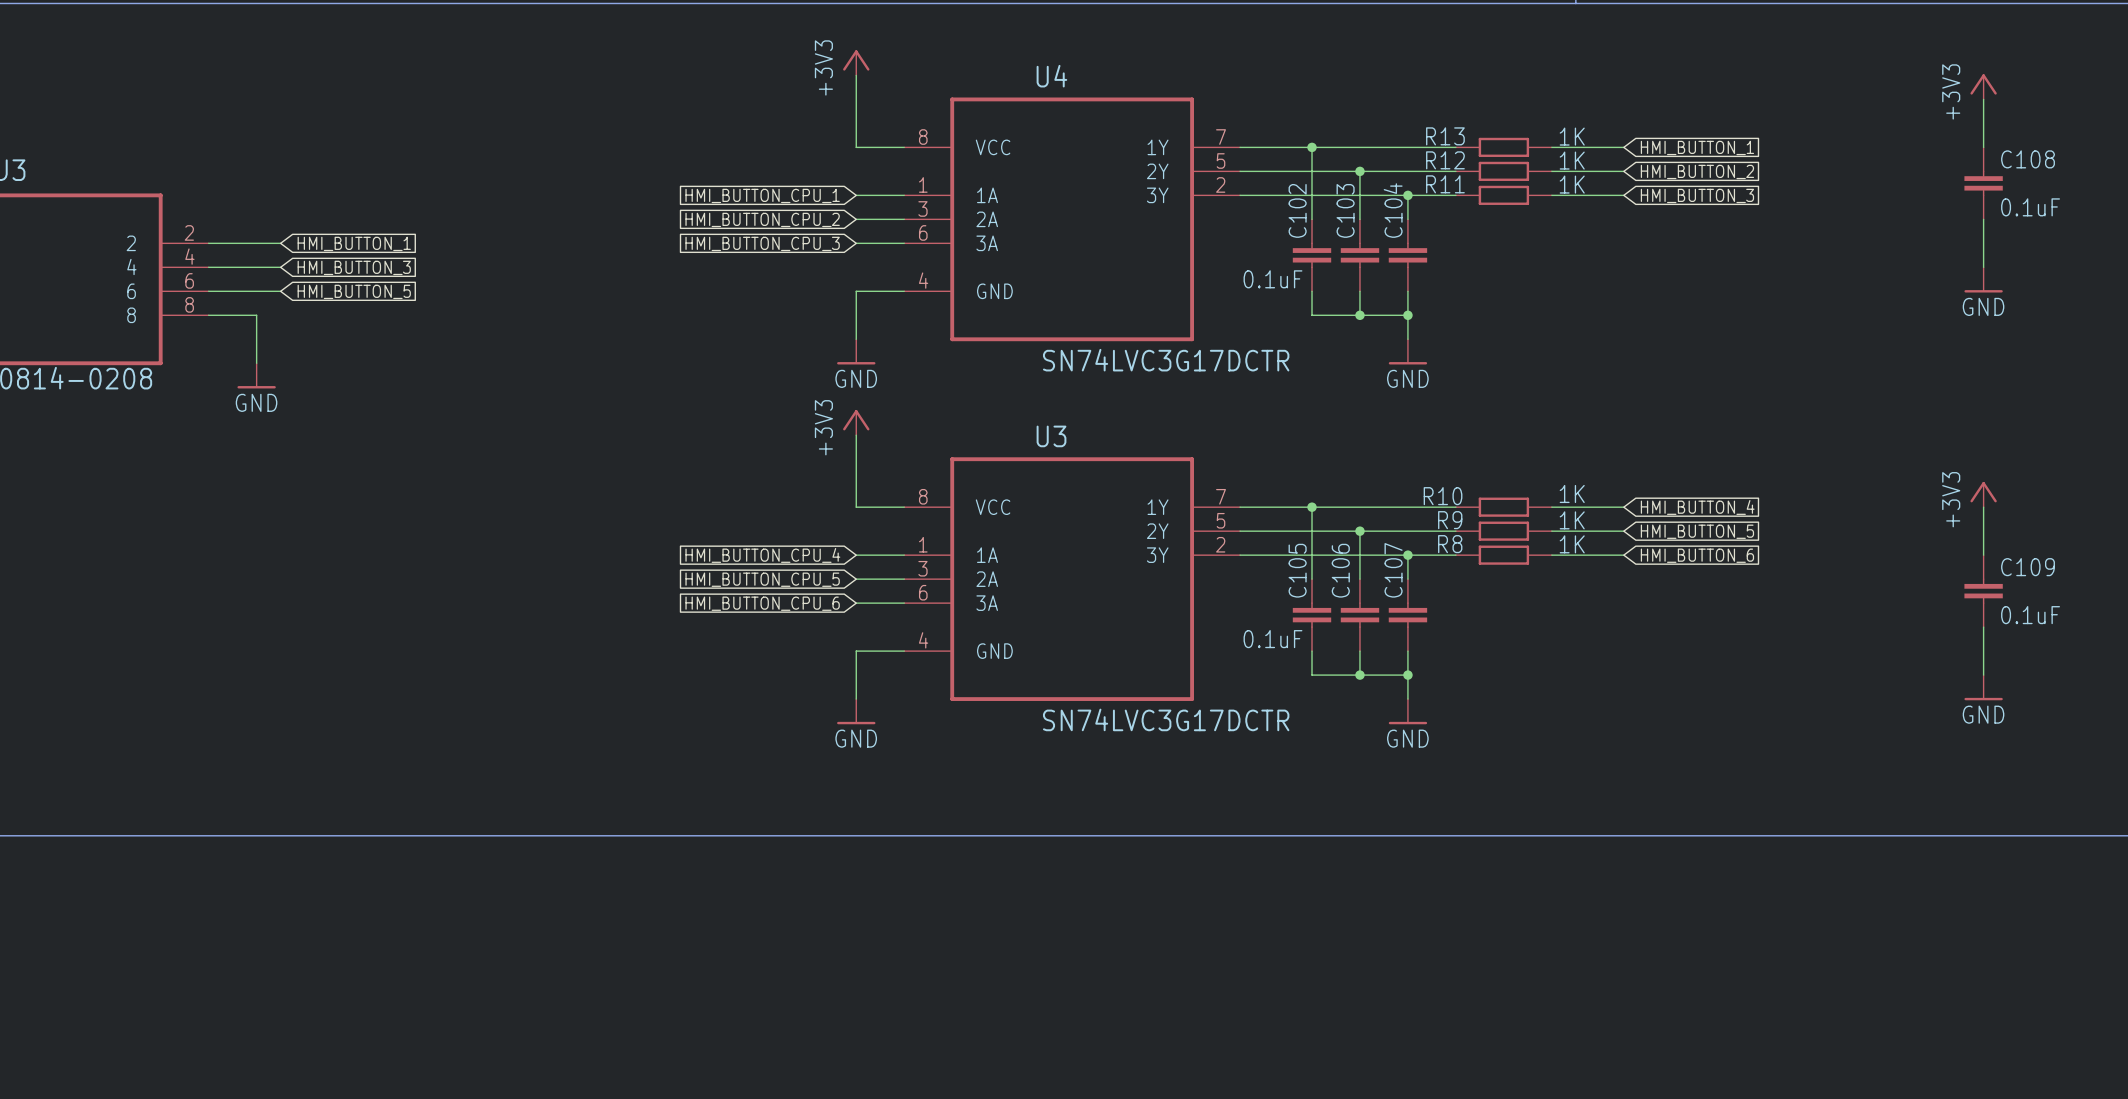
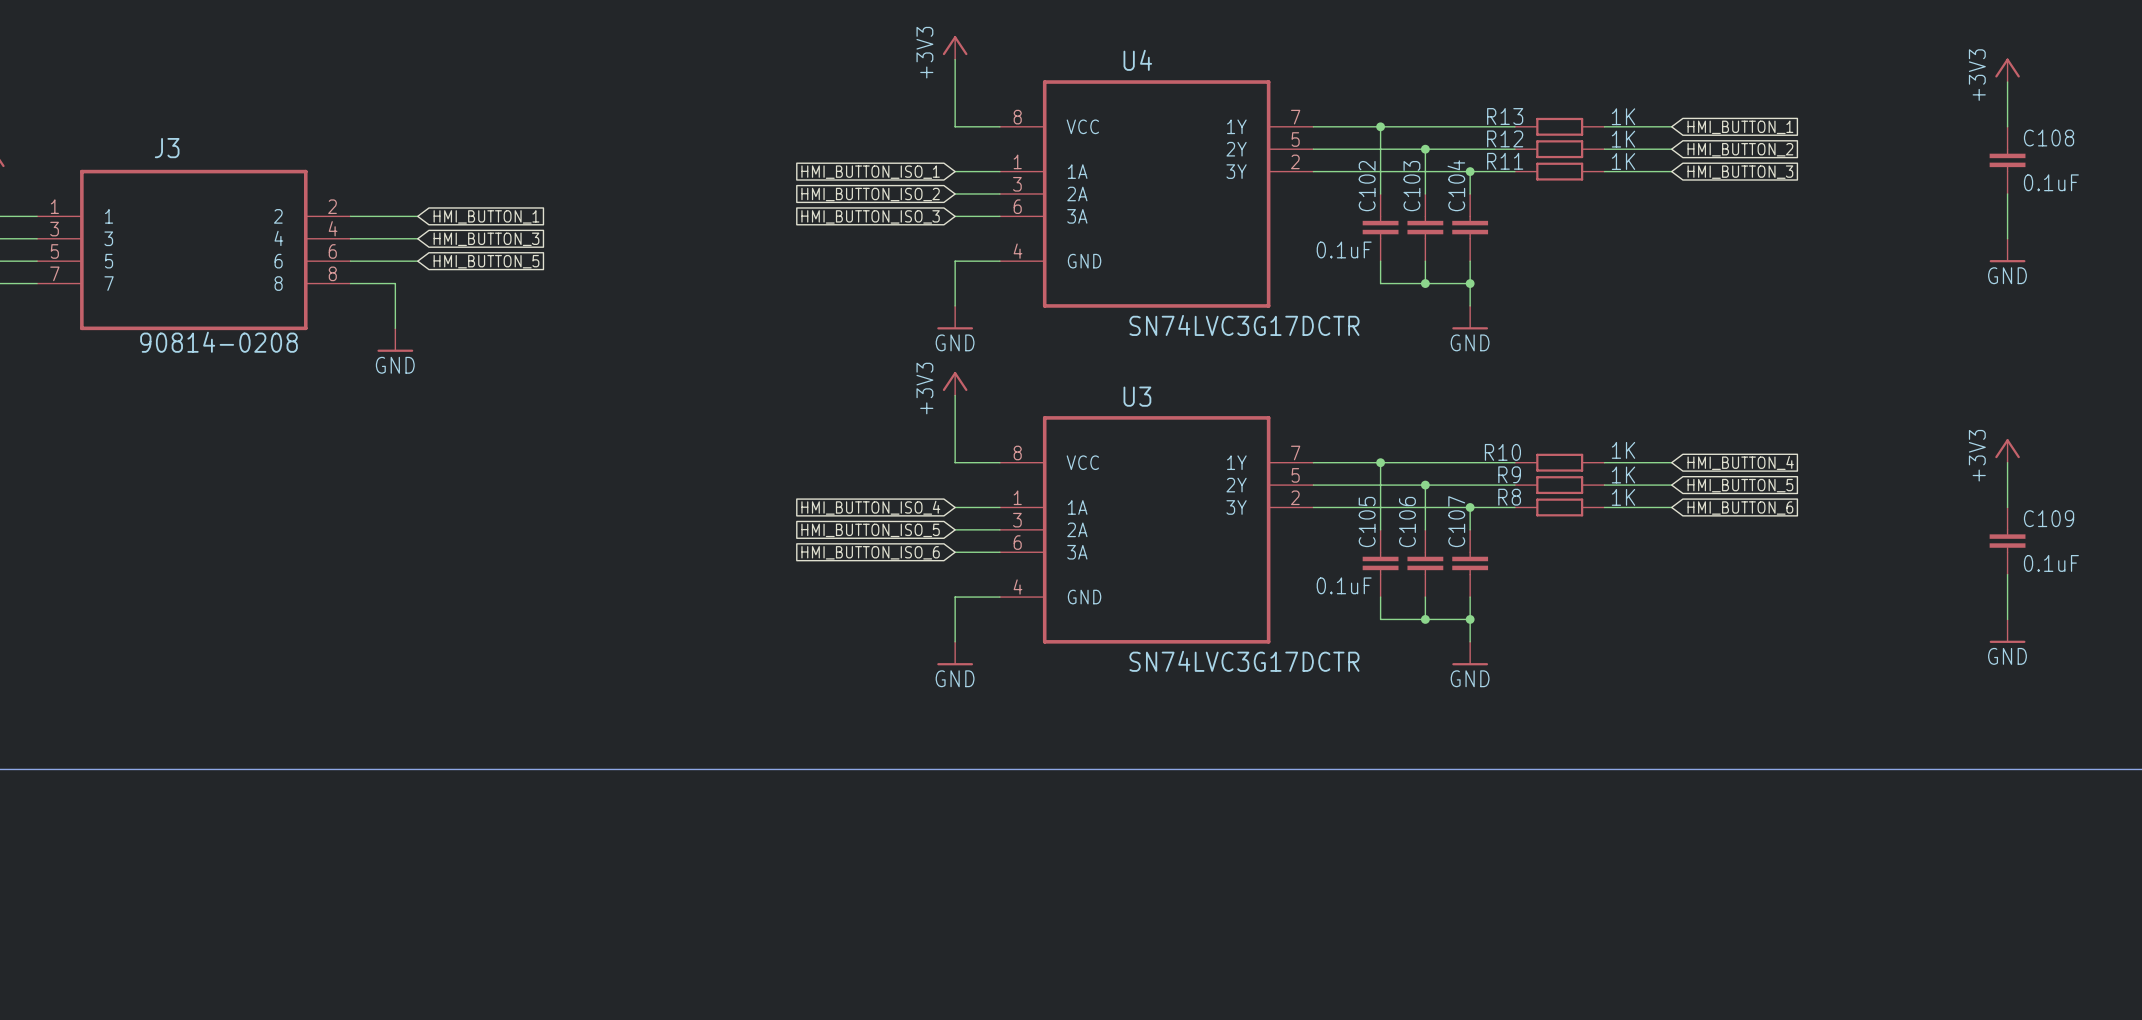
global label: HMI_BUTTON_CPU_1 (762, 195) -> HMI_BUTTON_ISO_1 (870, 172)
global label: HMI_BUTTON_CPU_2 (762, 219) -> HMI_BUTTON_ISO_2 (870, 194)
global label: HMI_BUTTON_CPU_3 (762, 243) -> HMI_BUTTON_ISO_3 (870, 216)
global label: HMI_BUTTON_CPU_4 (762, 555) -> HMI_BUTTON_ISO_4 (870, 507)
global label: HMI_BUTTON_CPU_5 (762, 579) -> HMI_BUTTON_ISO_5 (870, 530)
global label: HMI_BUTTON_CPU_6 (762, 603) -> HMI_BUTTON_ISO_6 (870, 552)

